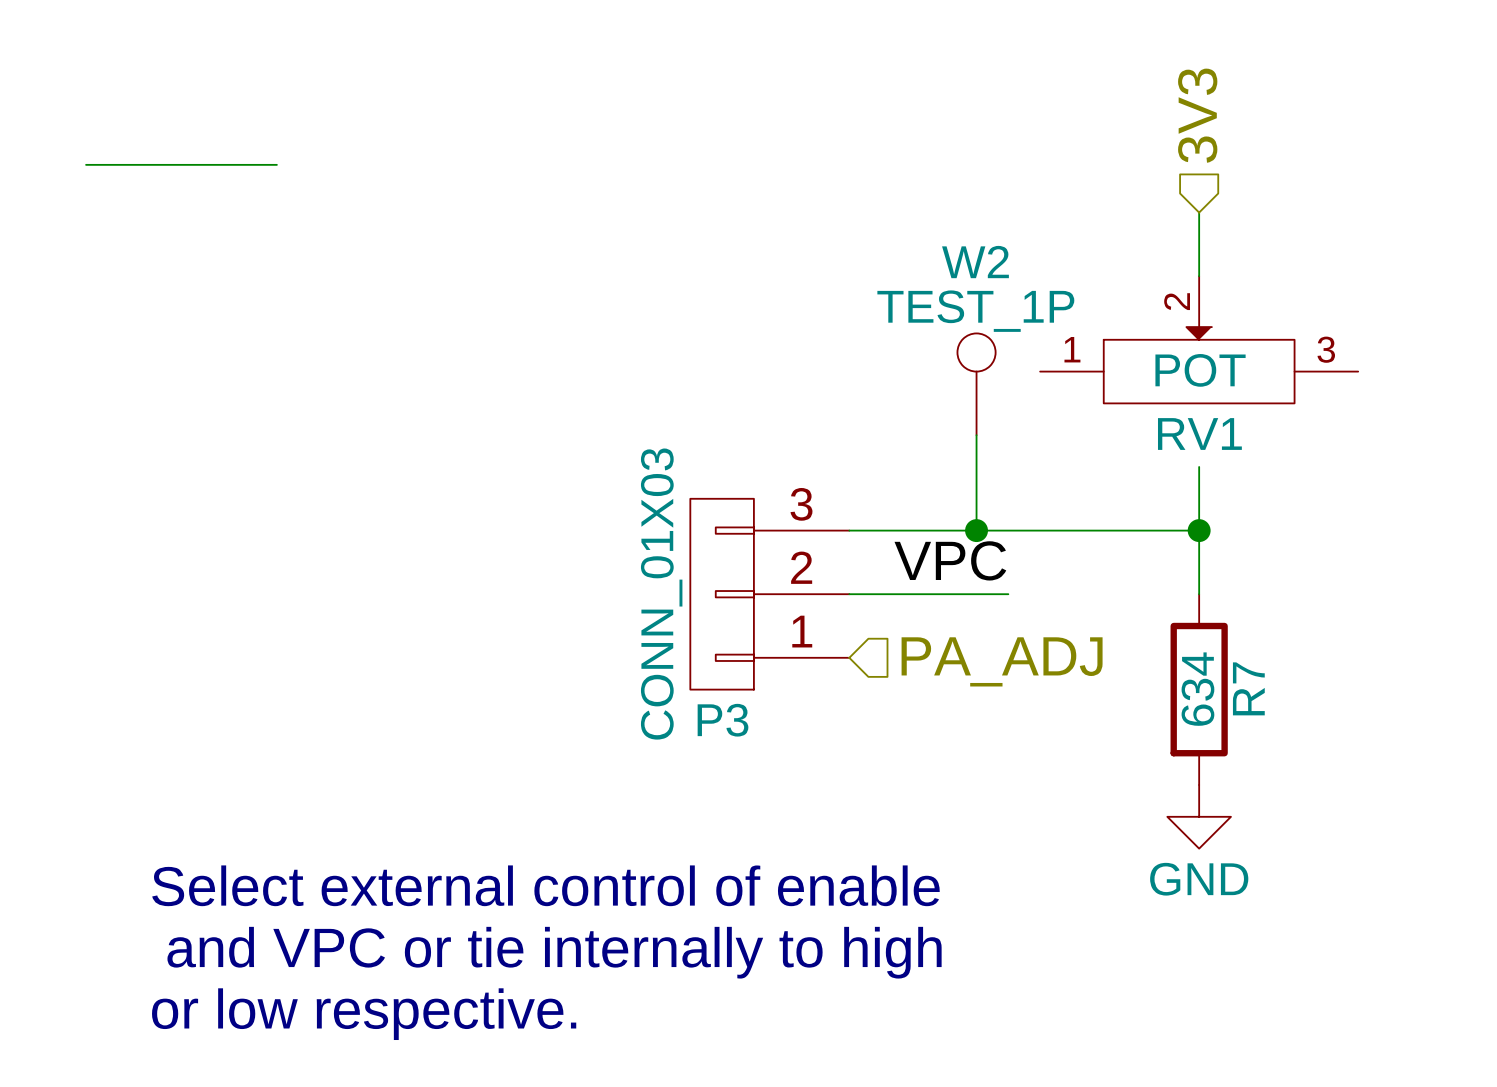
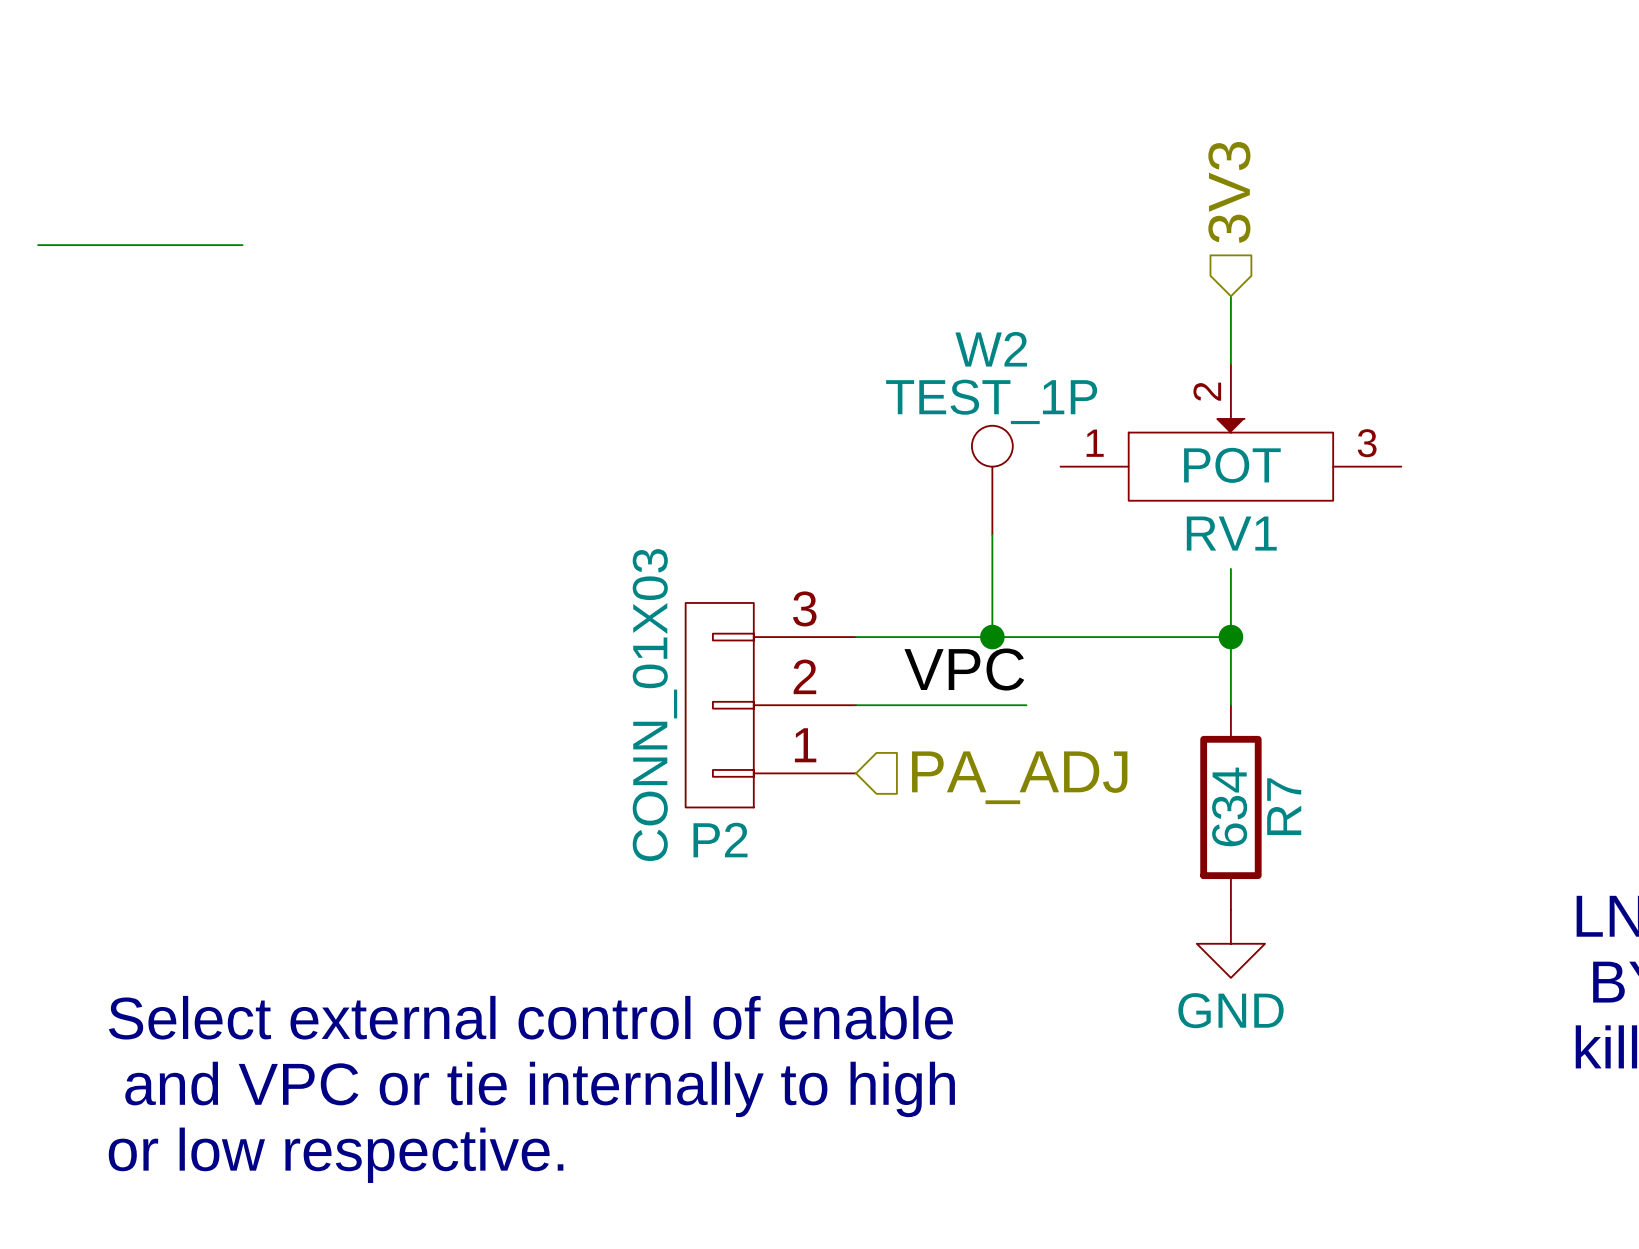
P3 name: P3 (723, 720) -> P2 (720, 840)

